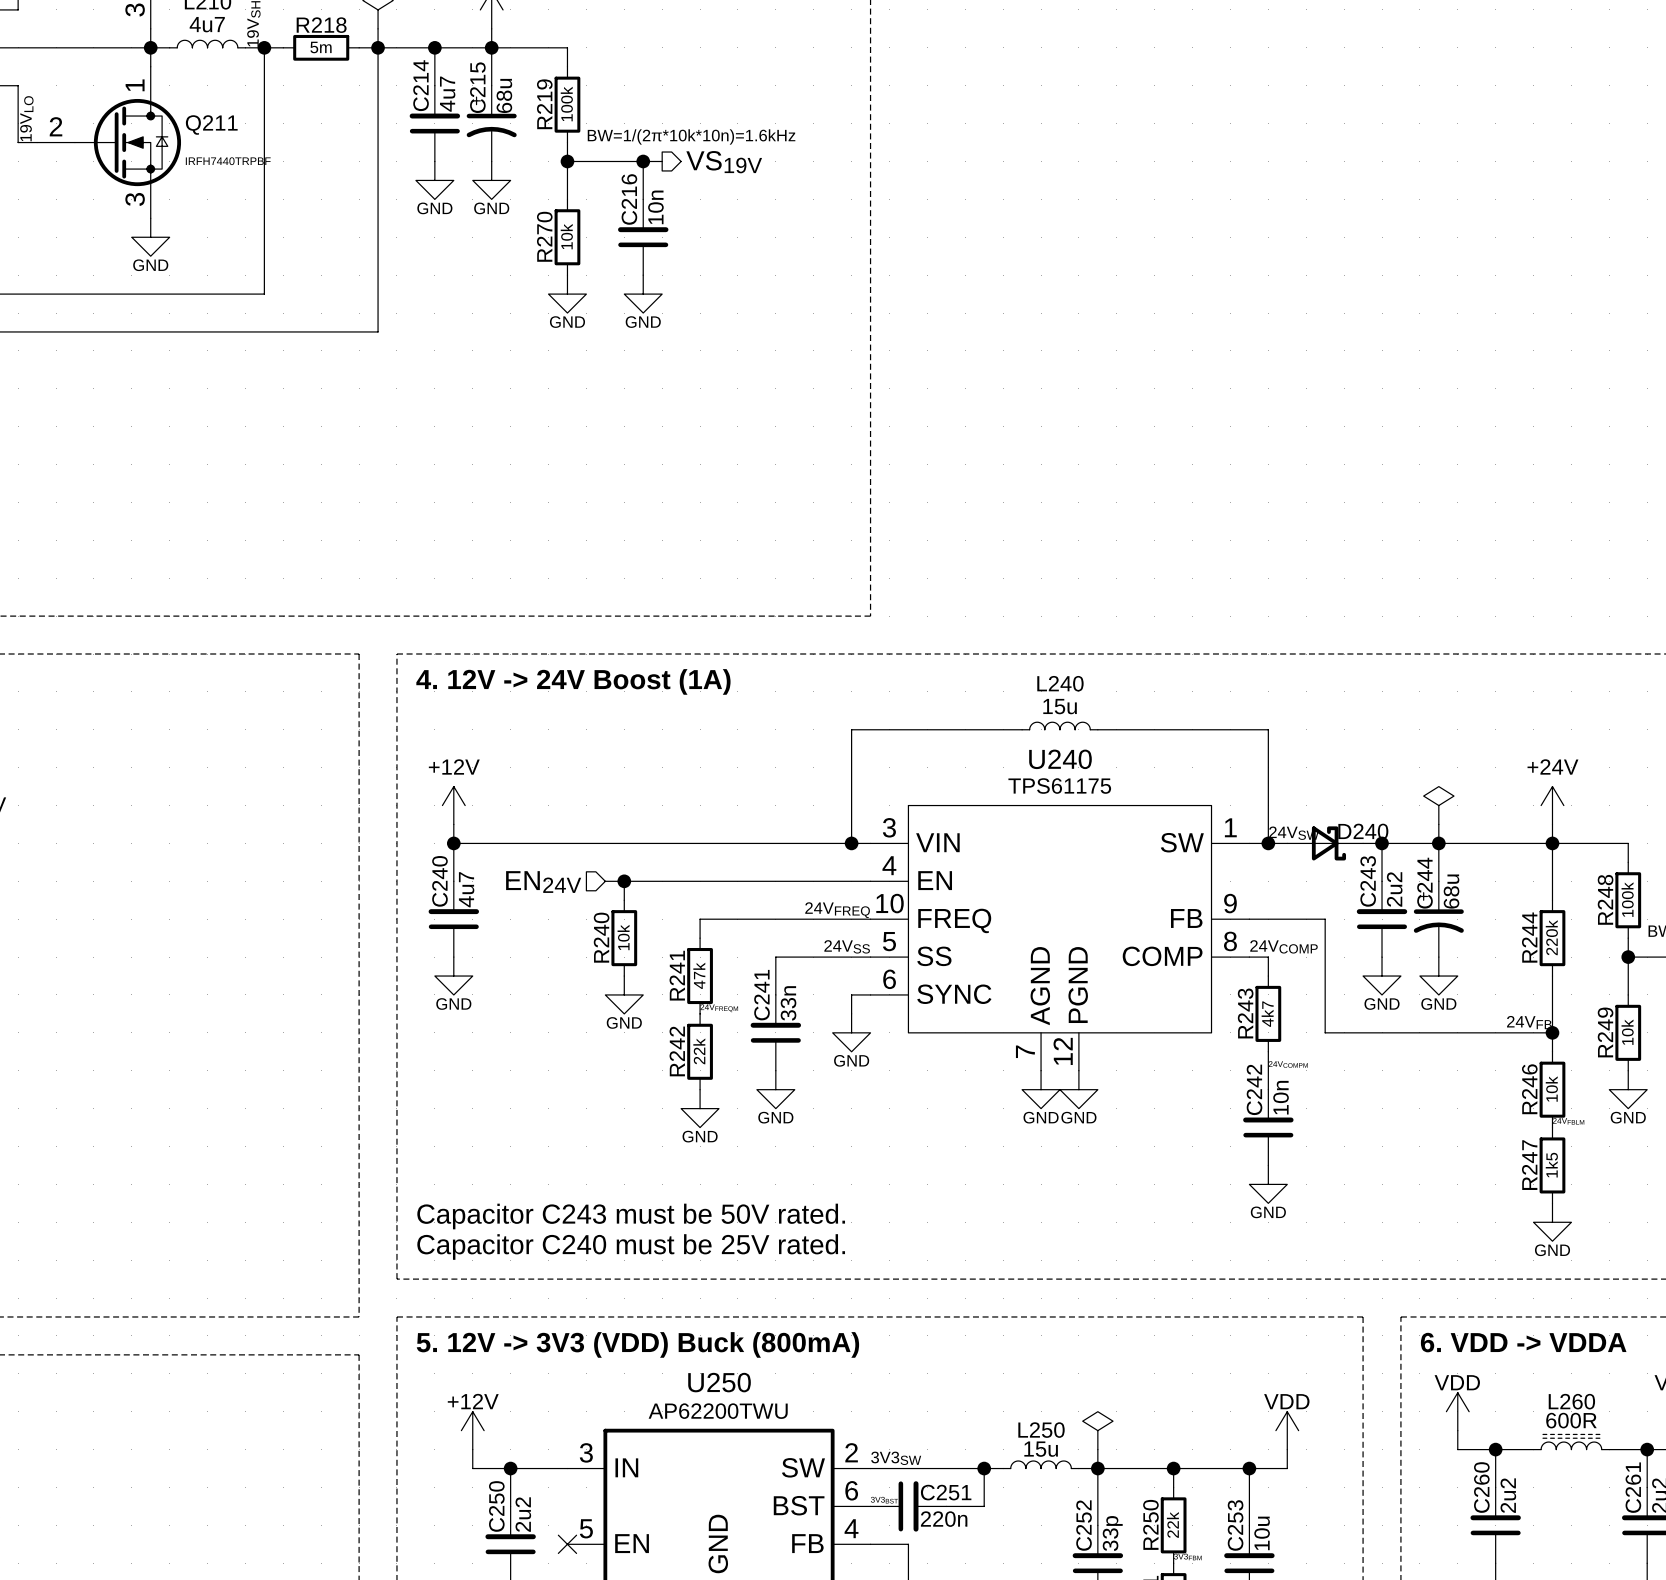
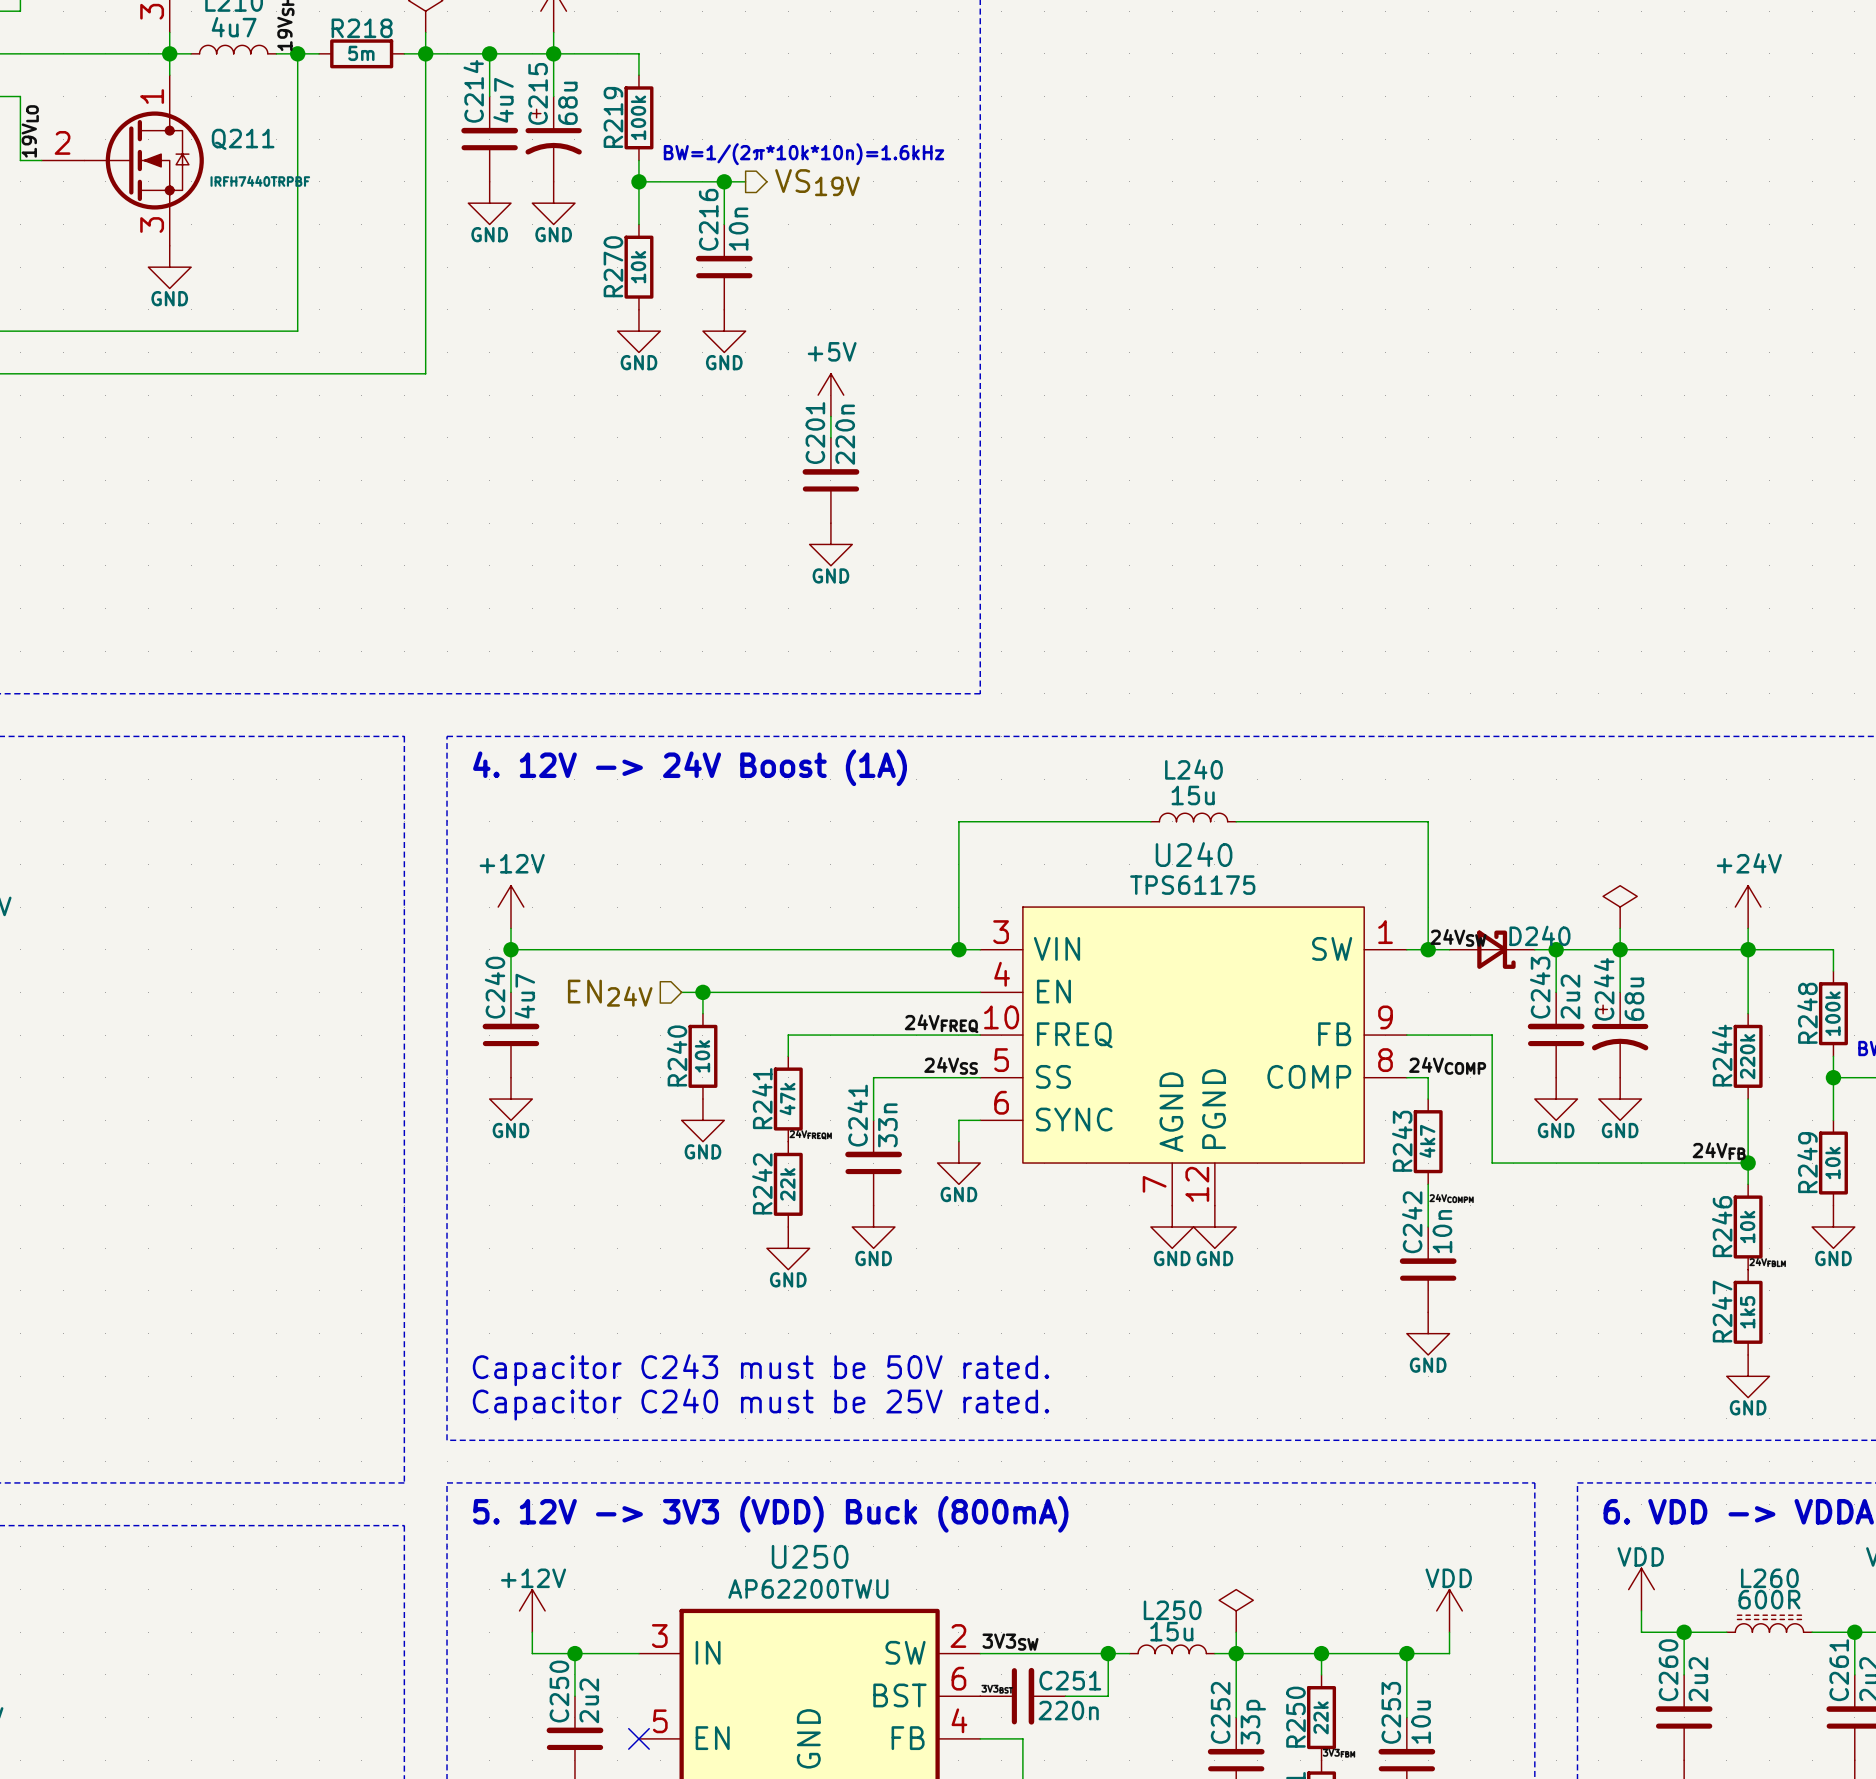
power symbol: none -> +5V (830, 395)
wire: none -> (830, 416) (830, 437)
C201: none -> 220n (830, 480)
power symbol: none -> GND (830, 544)

